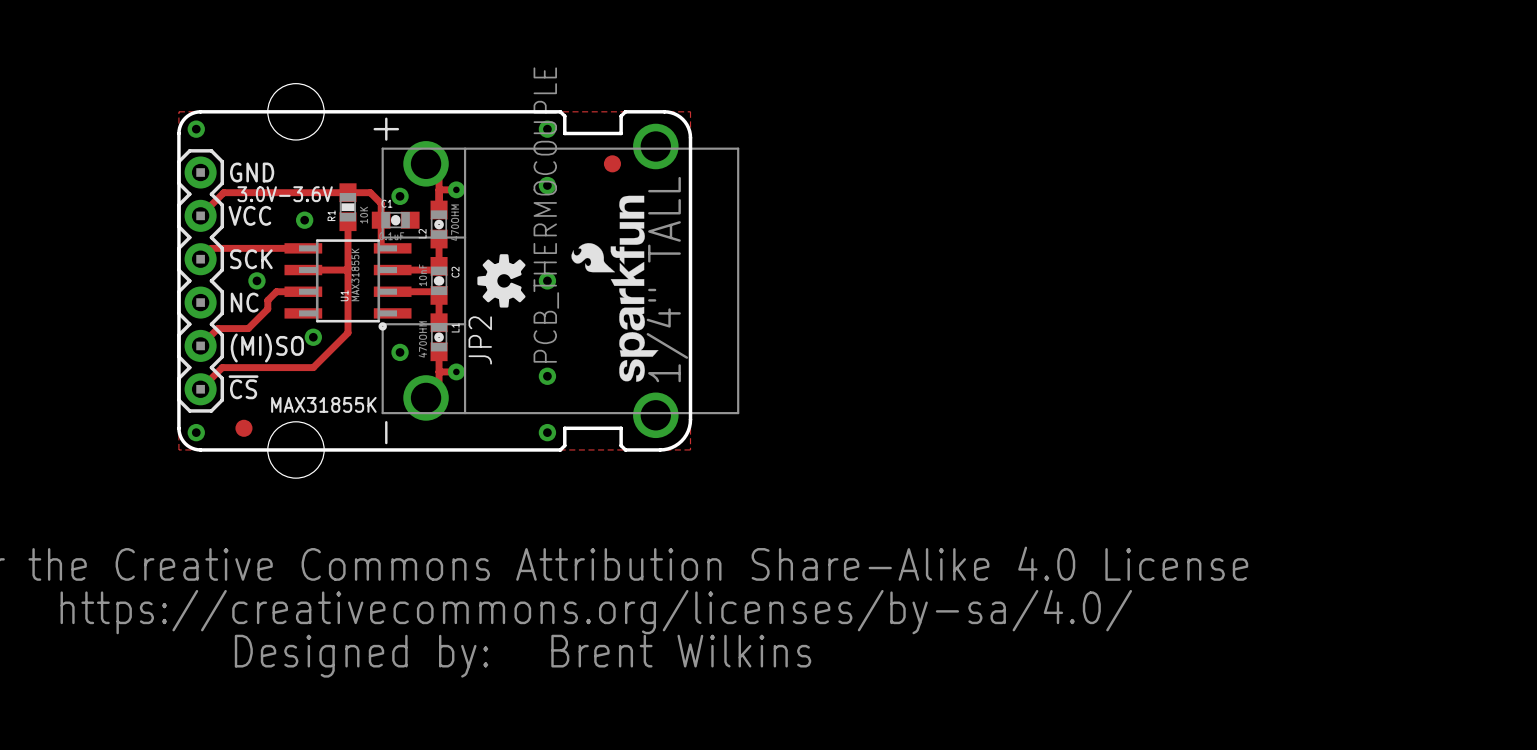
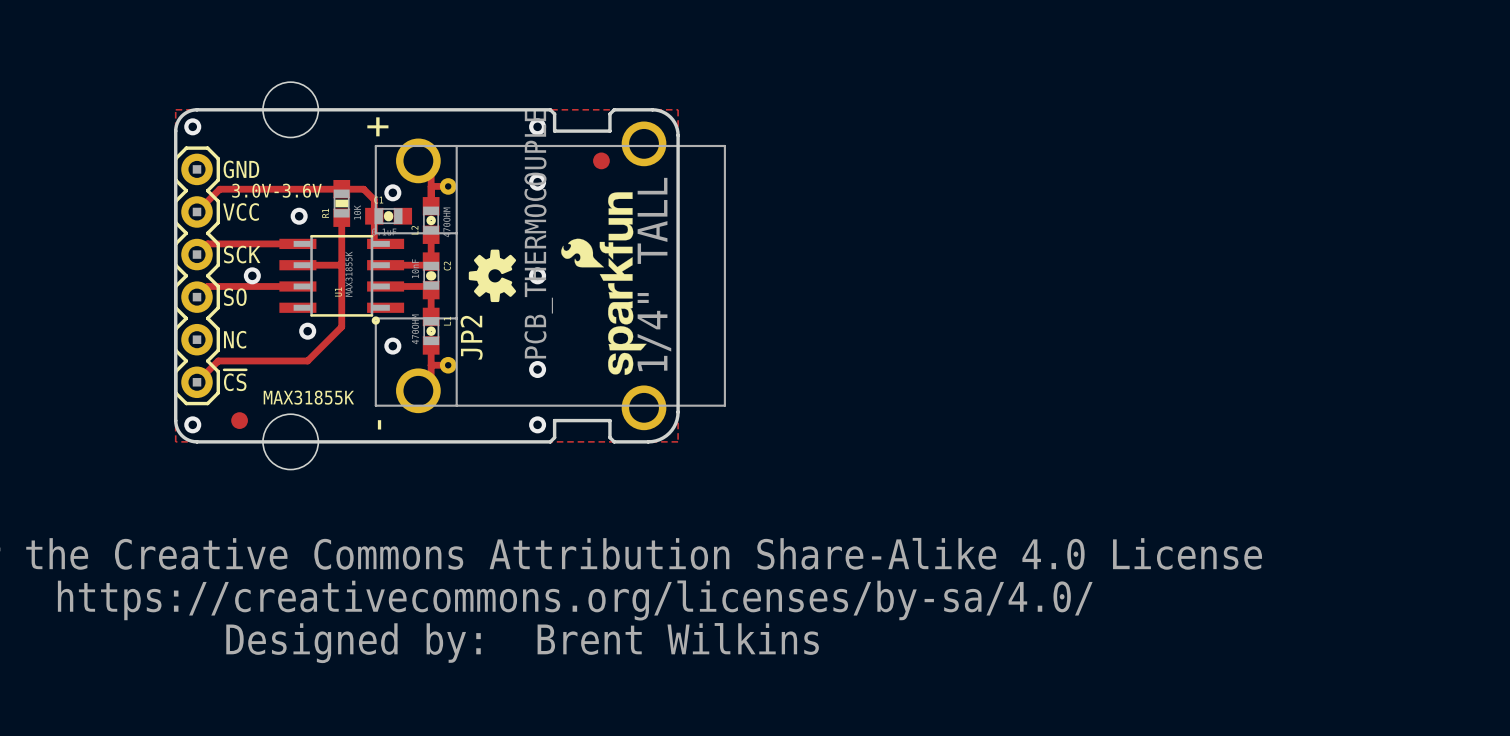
track: (276, 291) (267, 300) (267, 309) (248, 328) (217, 328) (200, 345) -> (271, 286) (207, 286) (197, 297)
text: NC (244, 302) -> SO (235, 297)
text: (MI)SO (267, 347) -> NC (235, 339)

